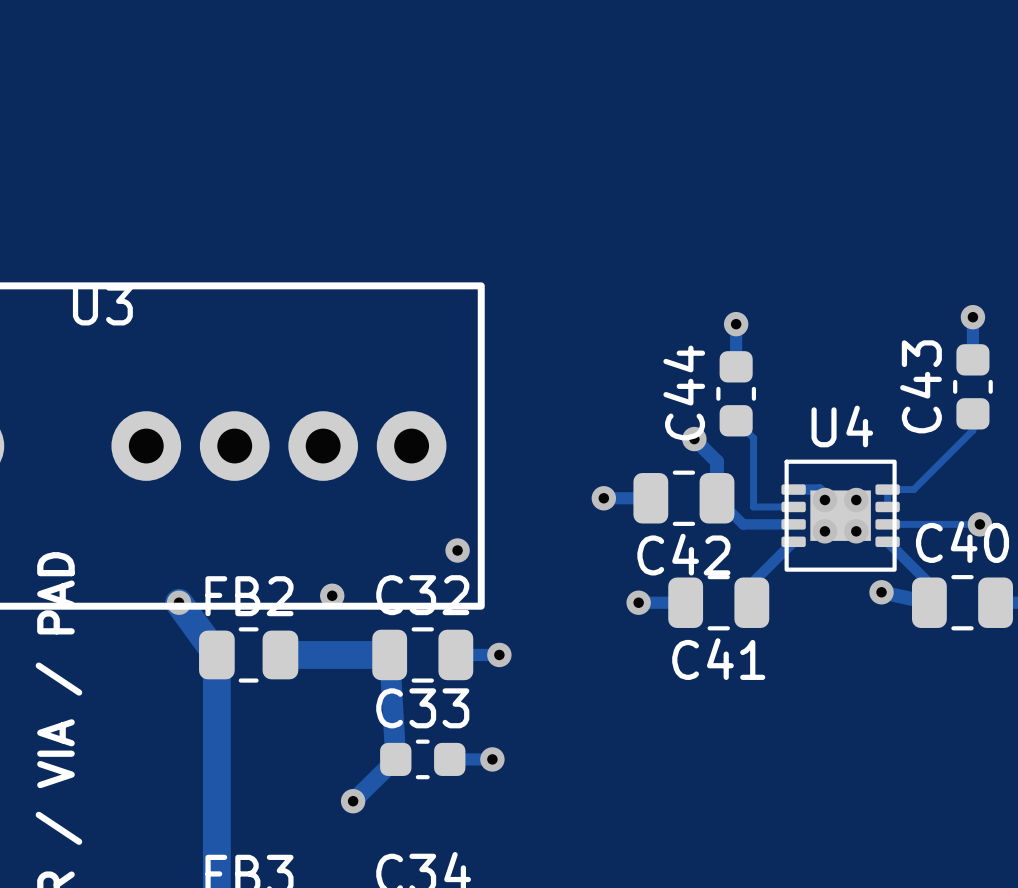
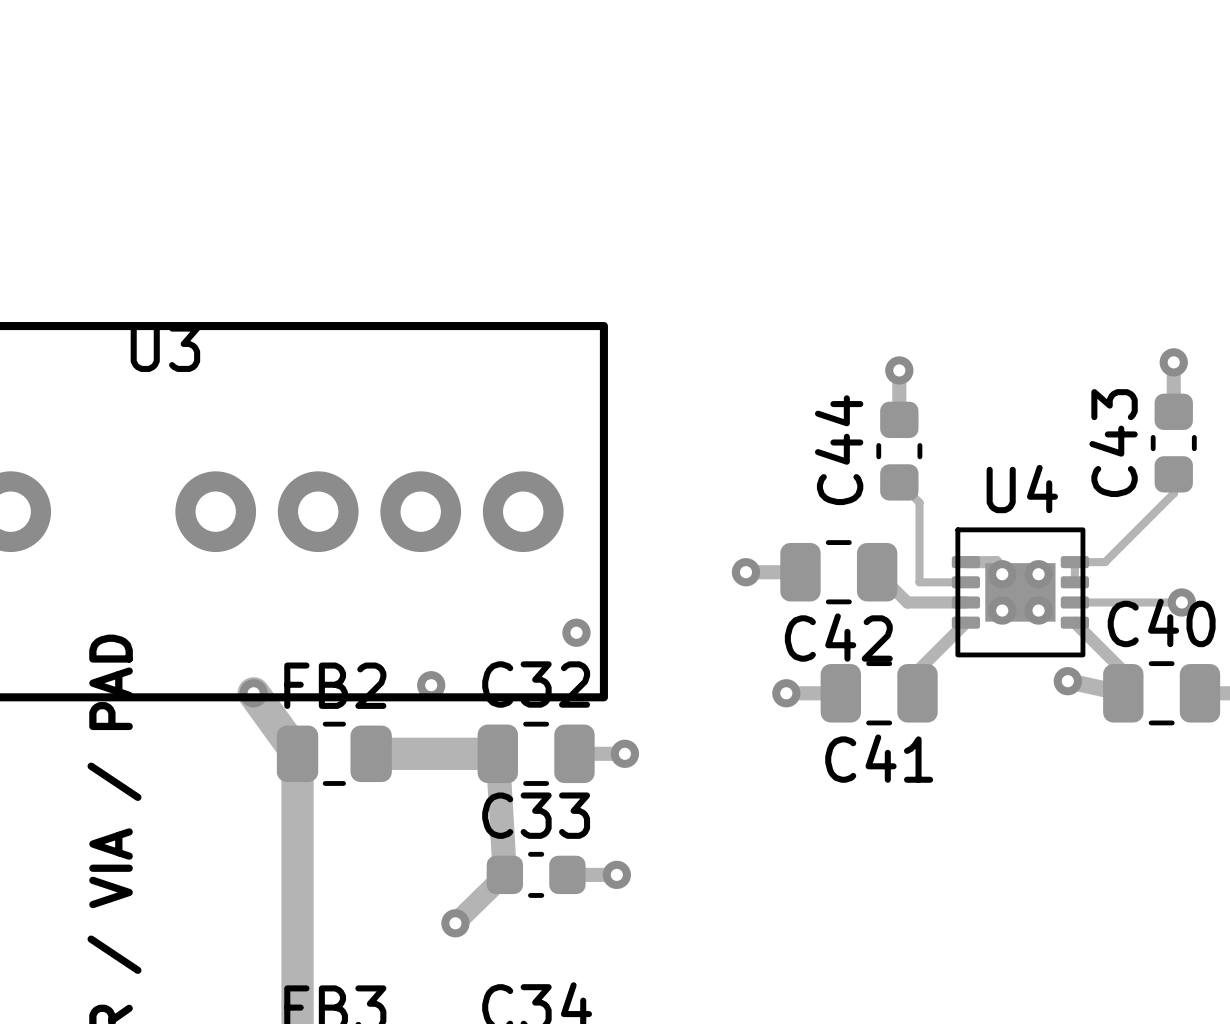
track: (694, 439) (717, 461) (717, 498) -> none
via: (694, 439) -> none

